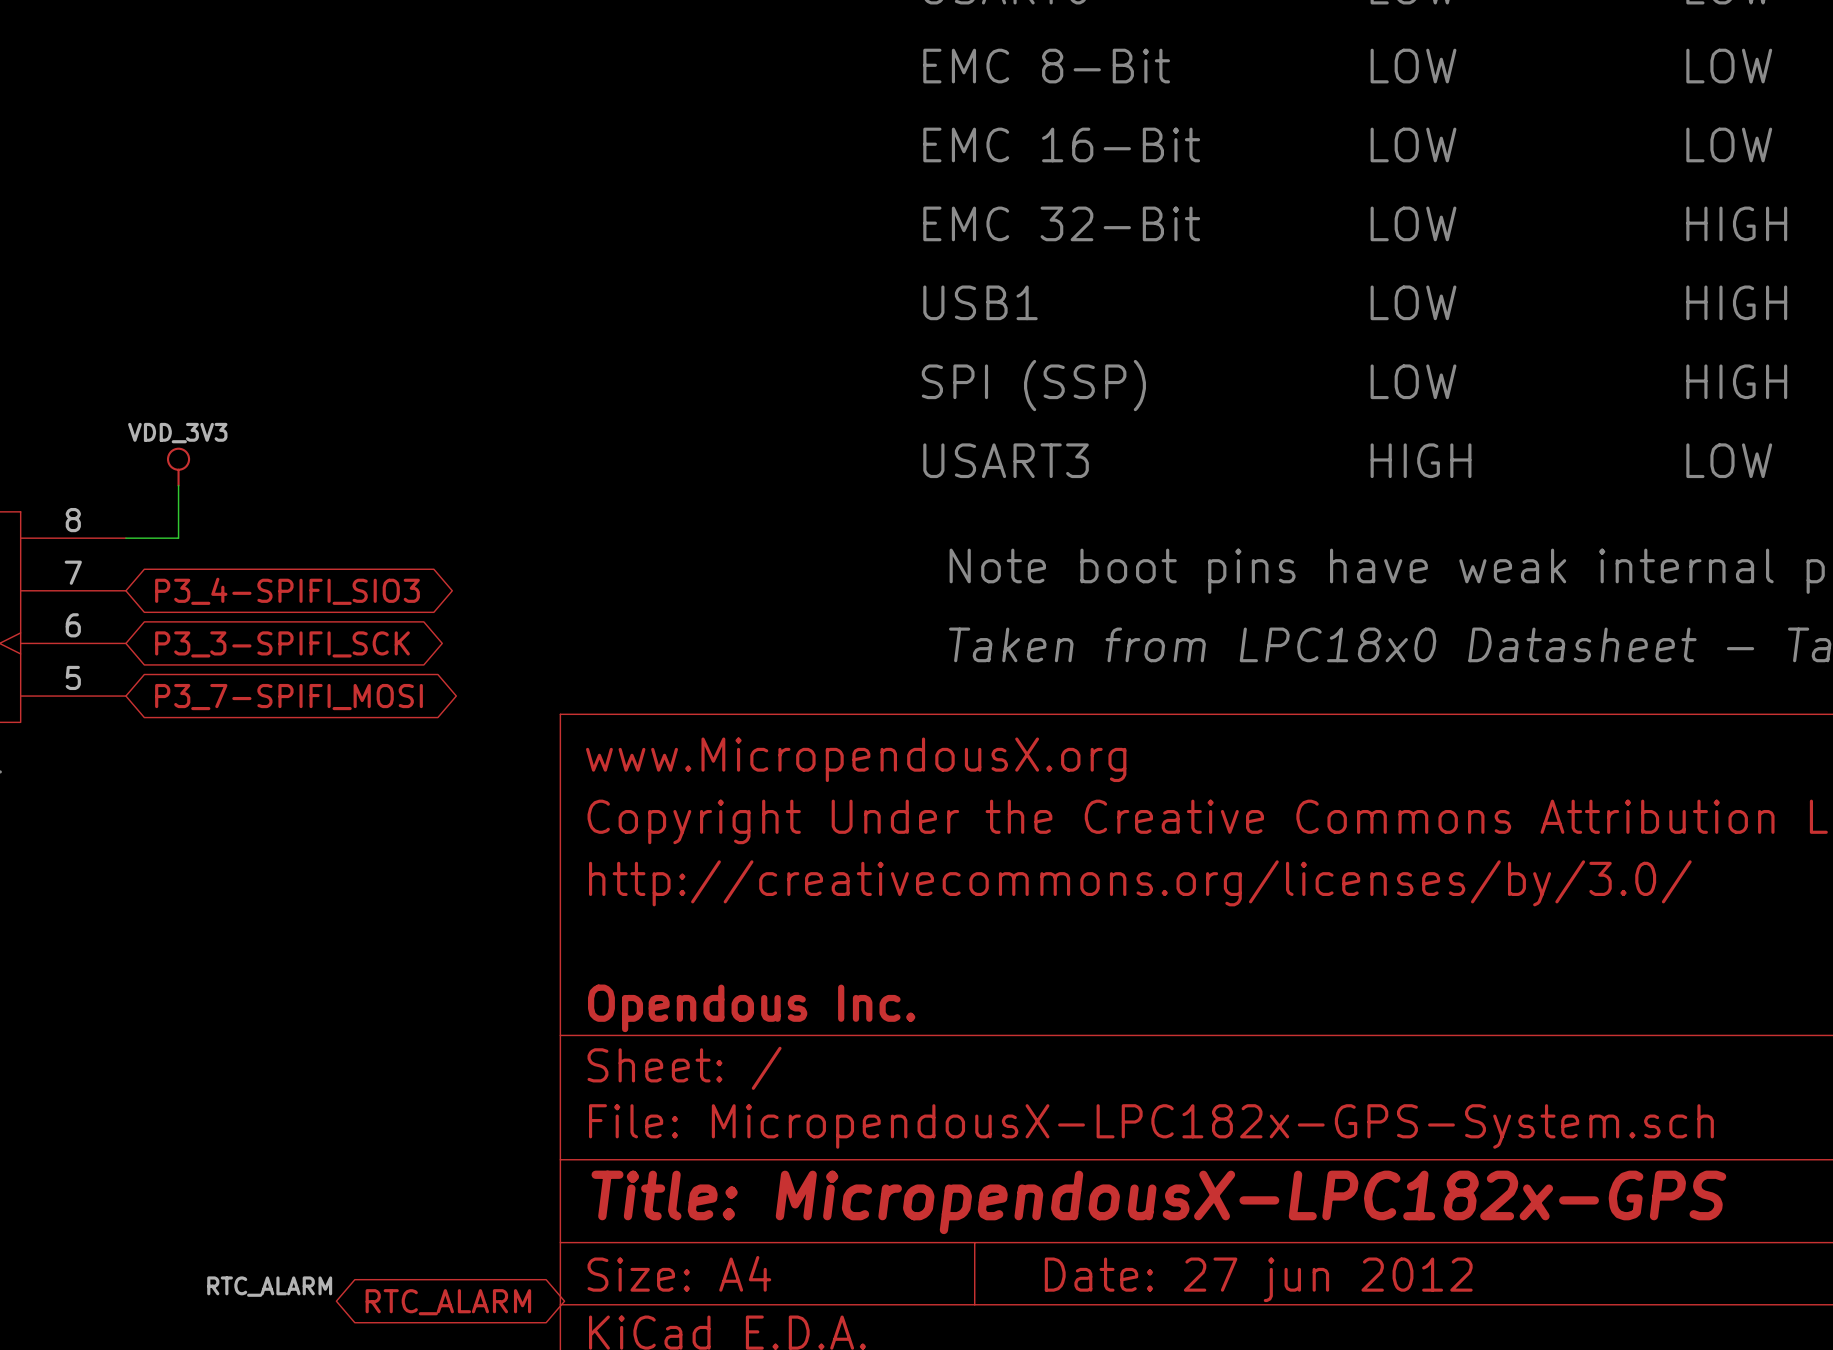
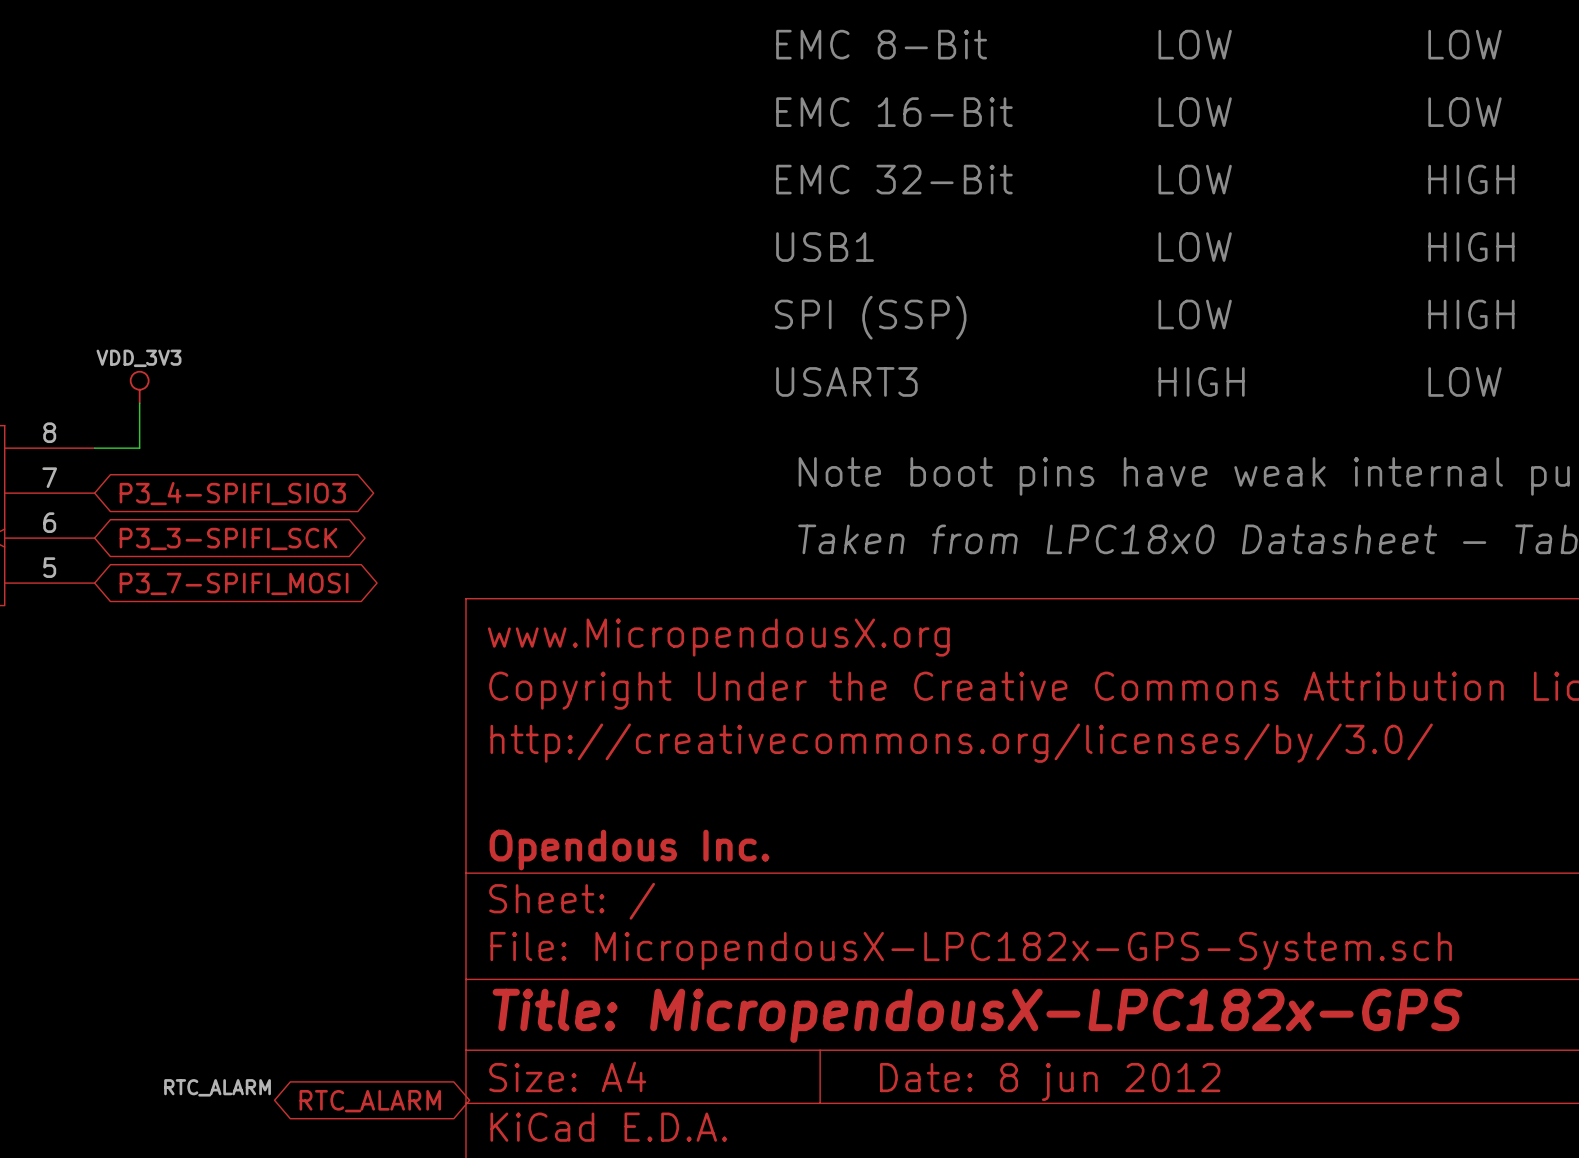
title block: Date: 27 jun 2012 (1258, 1279) -> Date: 8 jun 2012 (1050, 1081)

